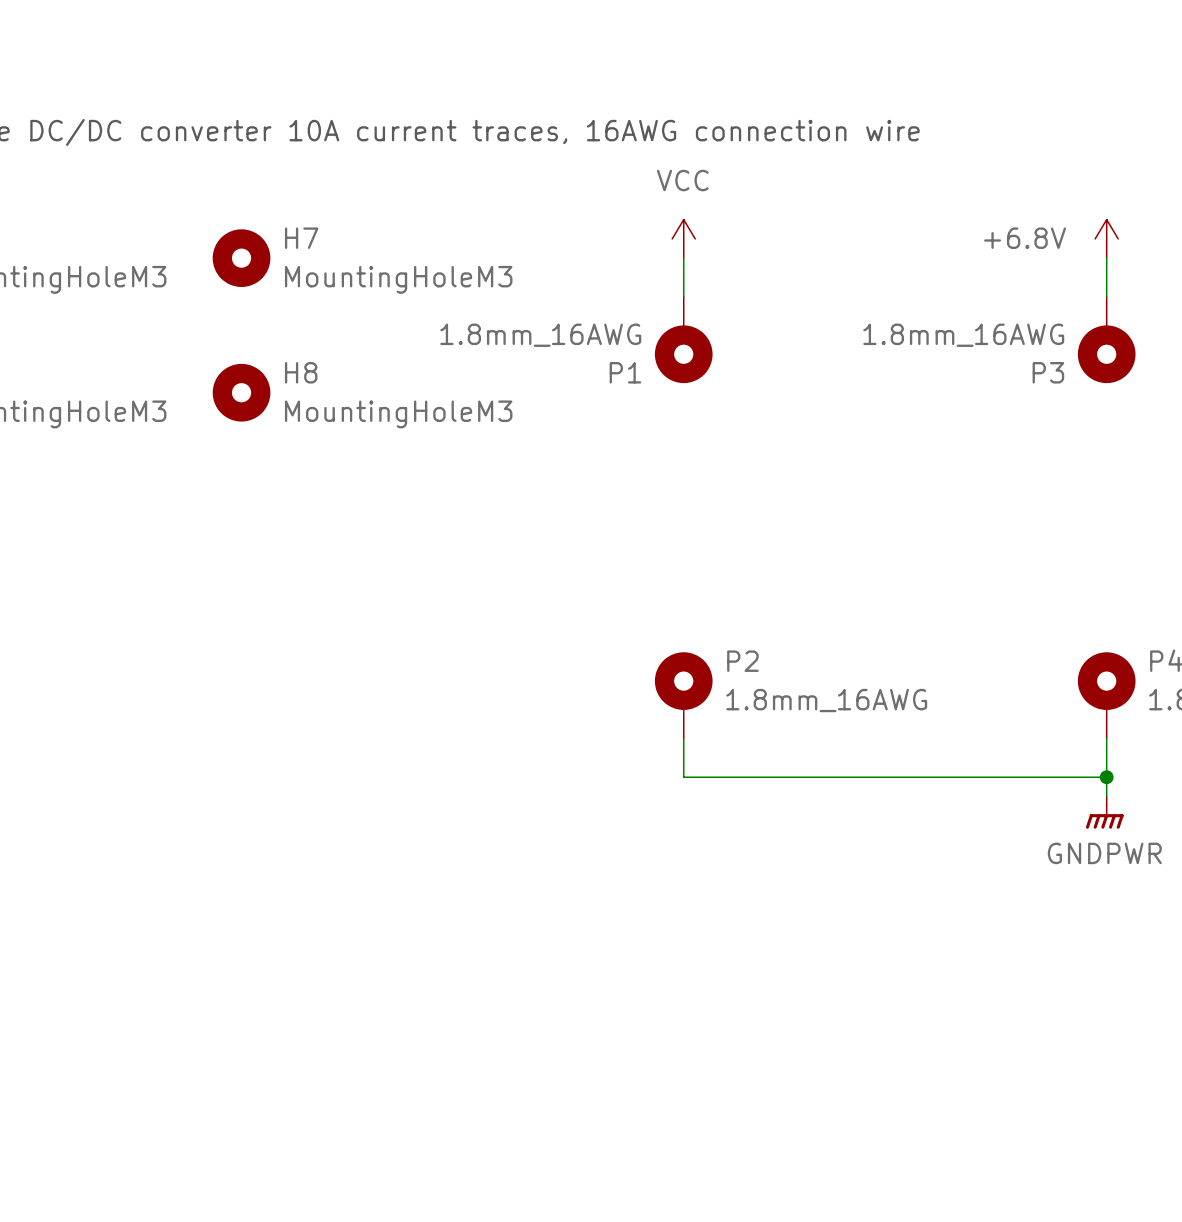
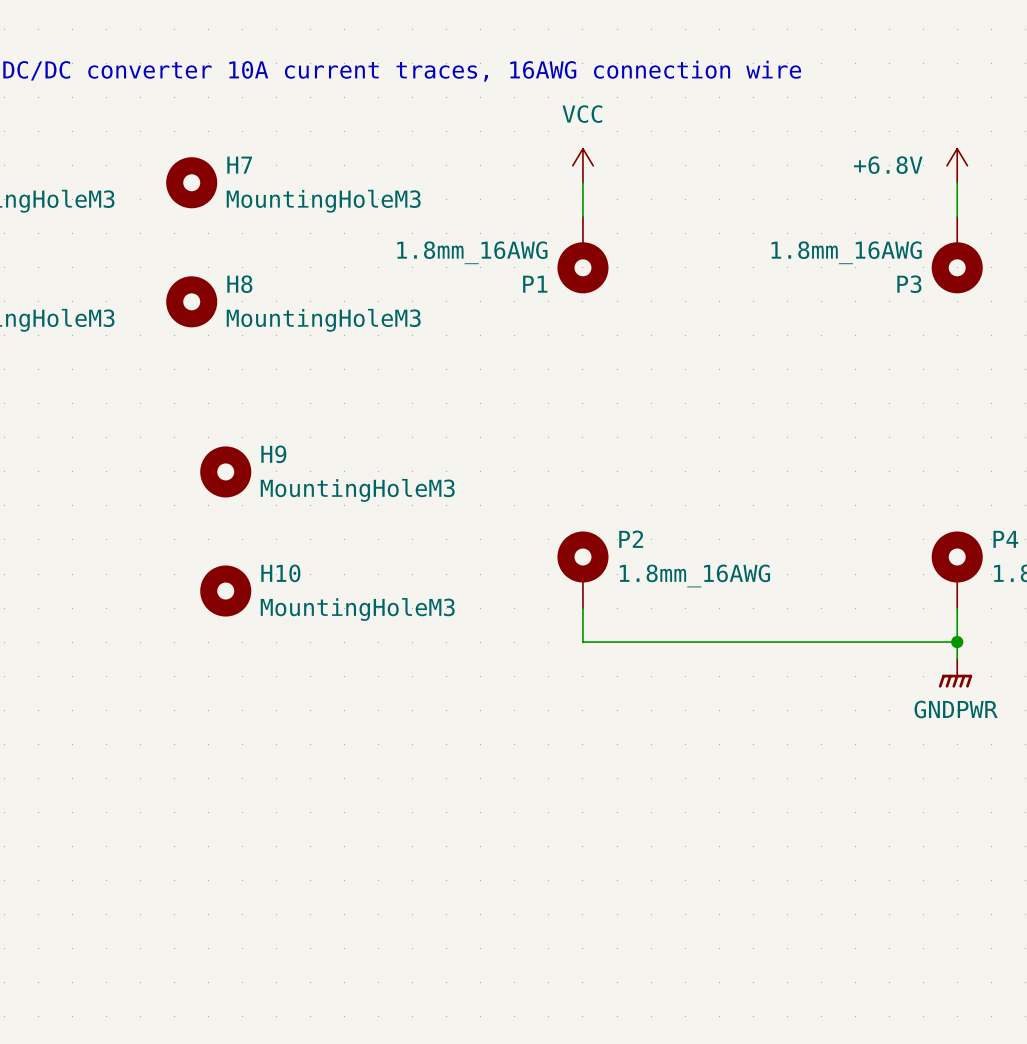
H9: none -> MountingHoleM3 (225, 471)
H10: none -> MountingHoleM3 (225, 591)

